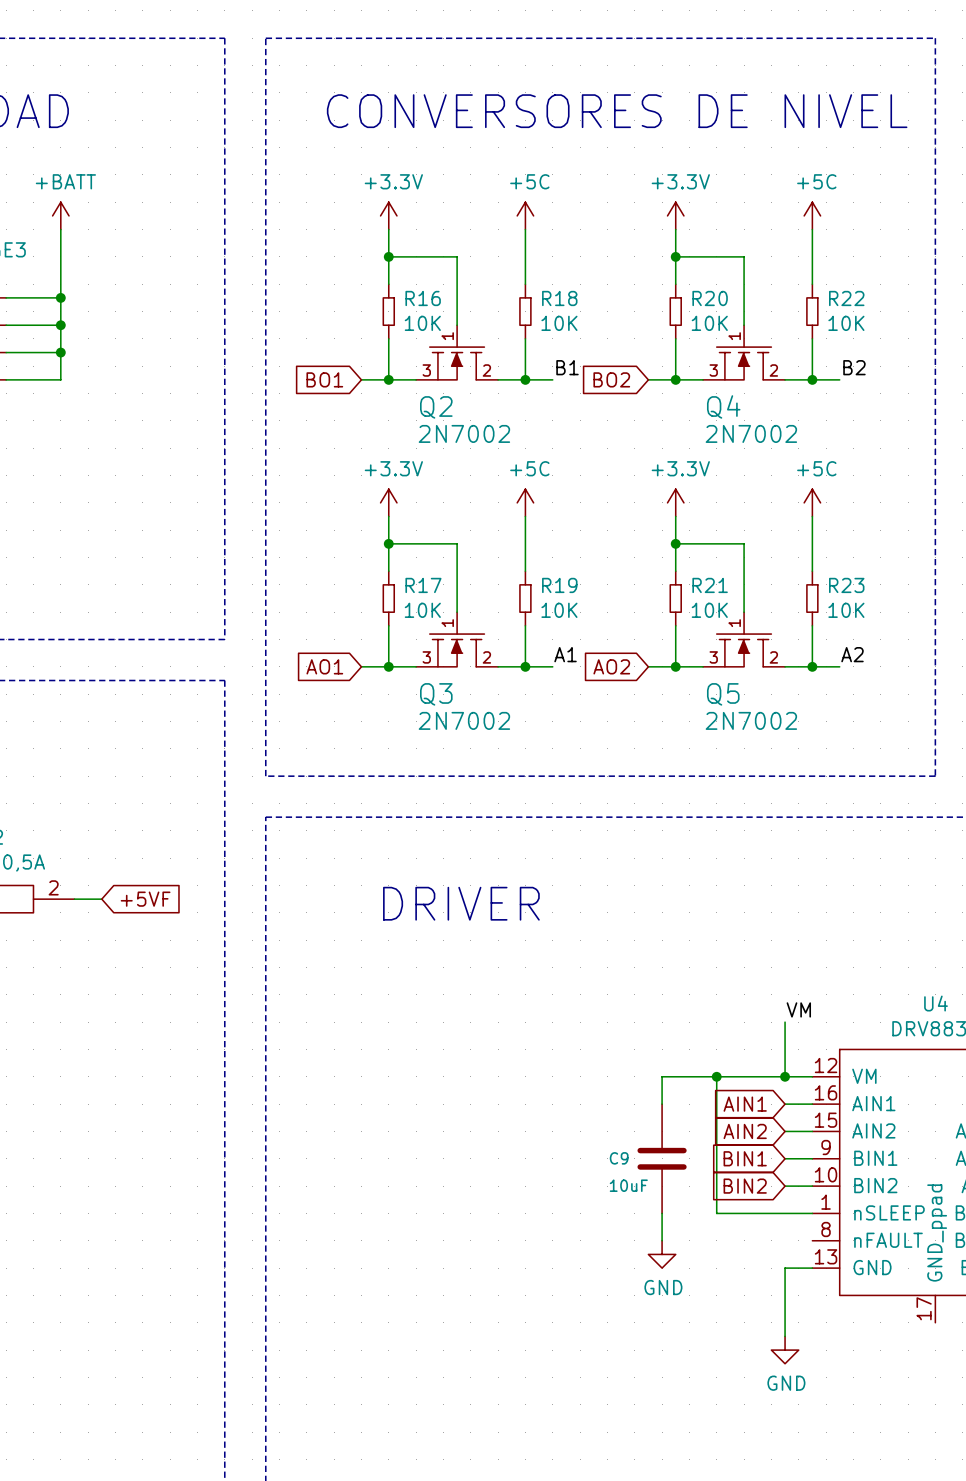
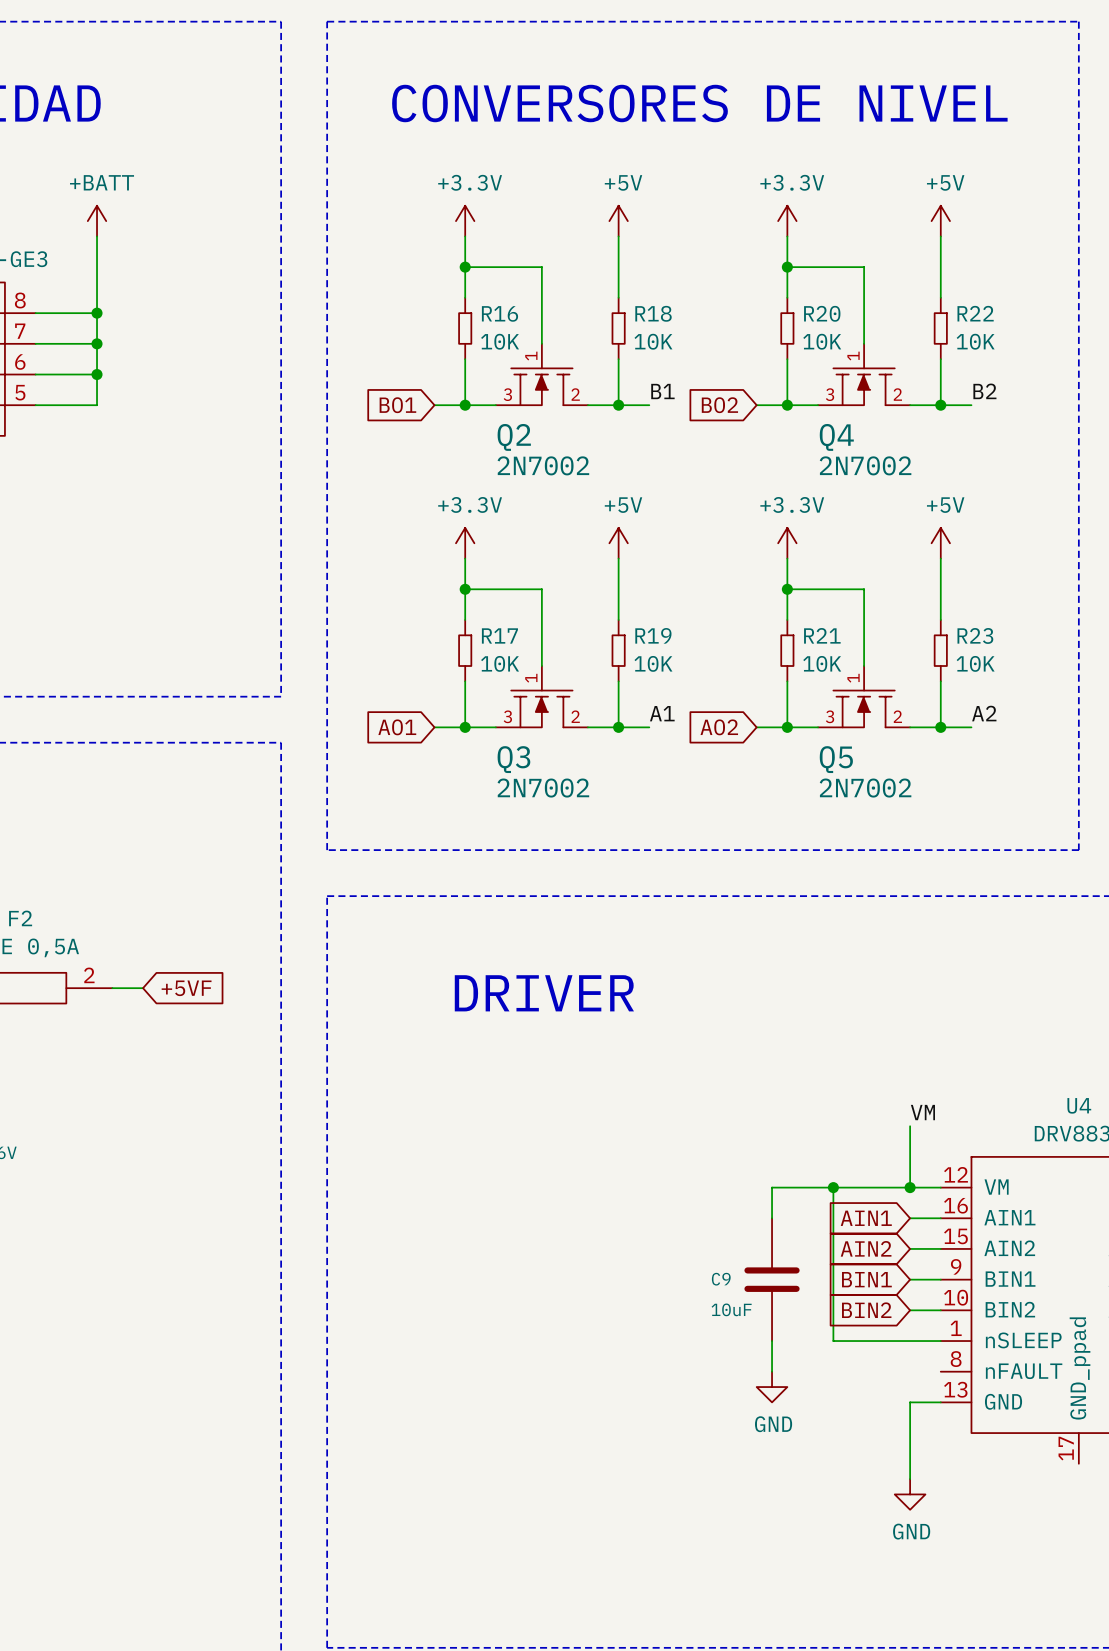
power symbol: +5C (525, 215) -> +5V (618, 221)
power symbol: +5C (812, 215) -> +5V (940, 221)
power symbol: +5C (525, 502) -> +5V (618, 543)
power symbol: +5C (812, 502) -> +5V (940, 543)

